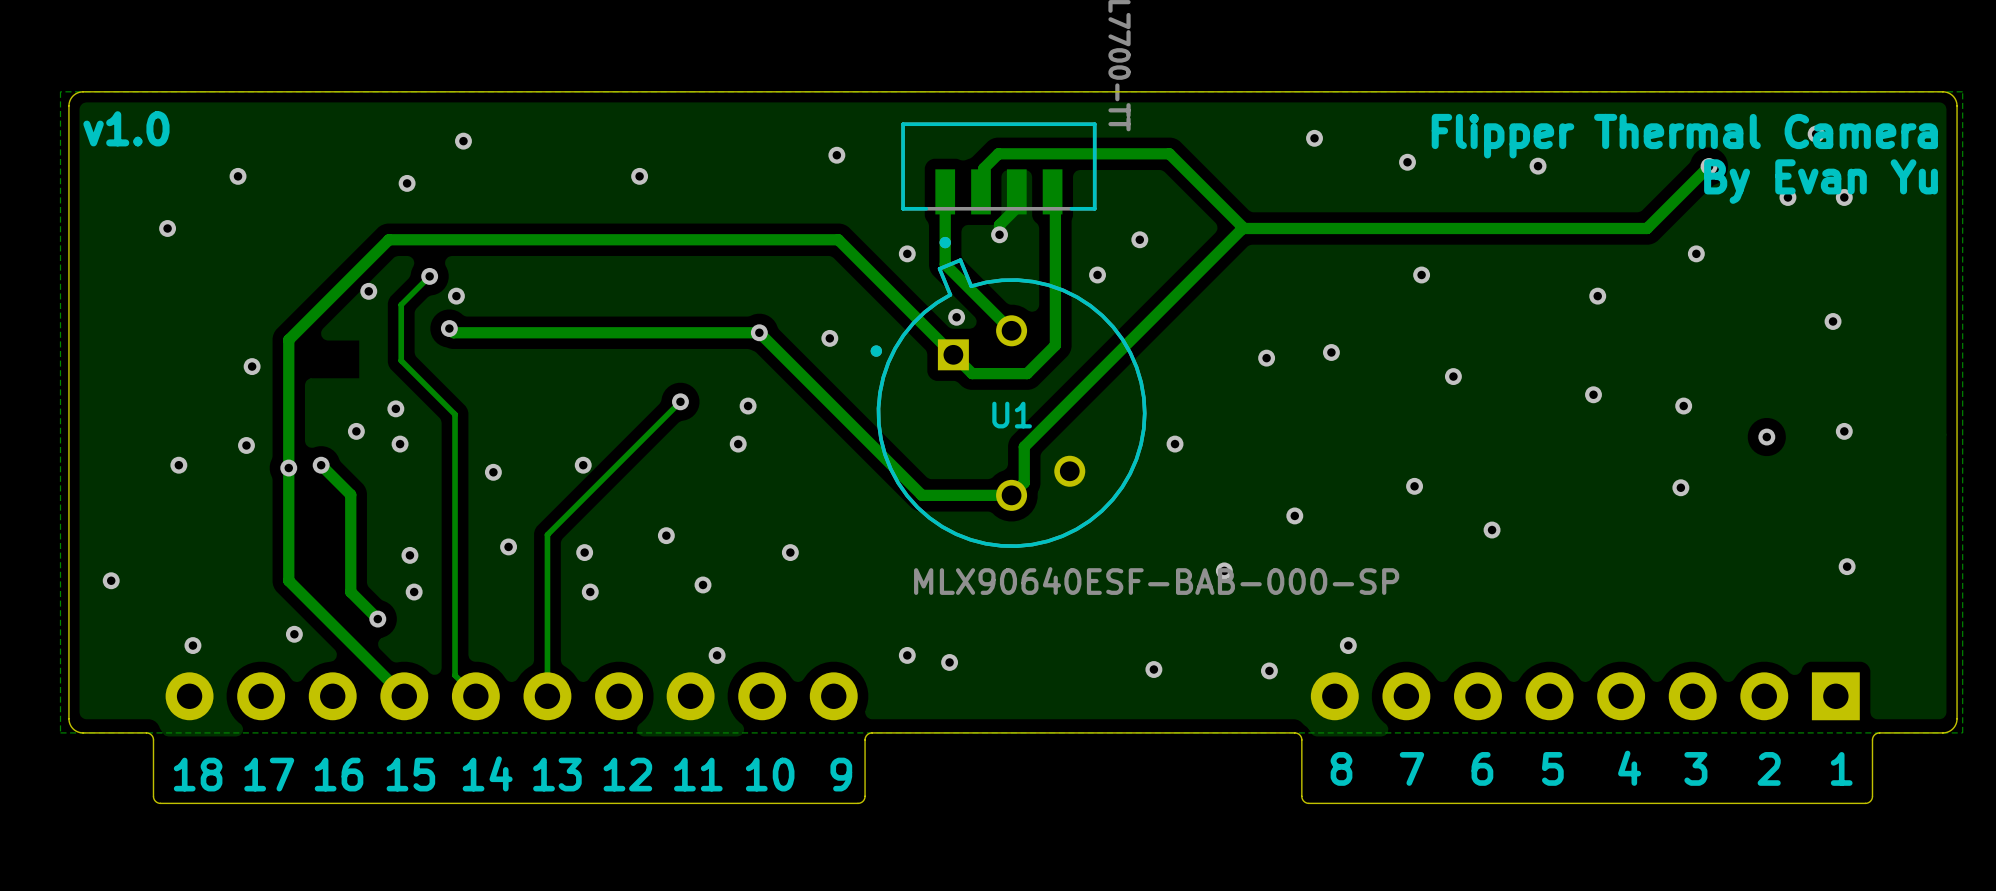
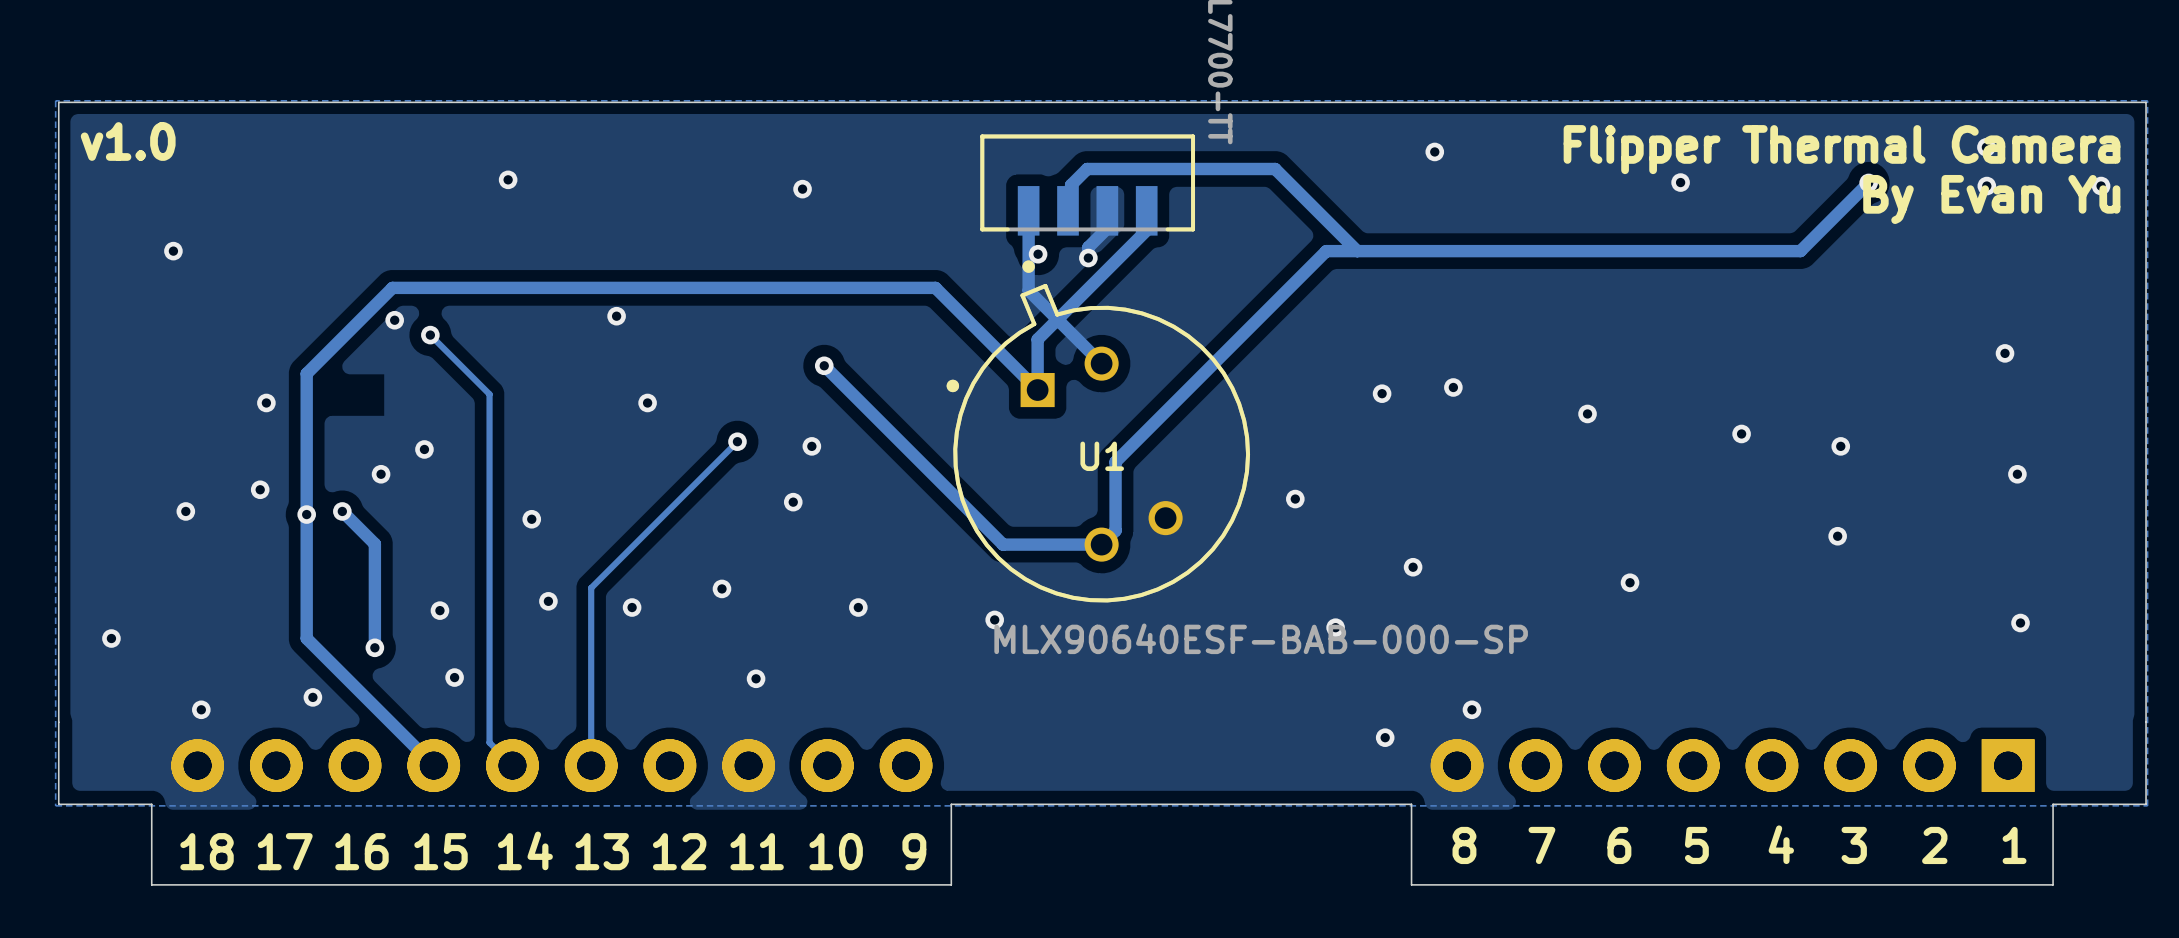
board edge: (1942, 91) (79, 92) (71, 97) (68, 105) (69, 722) (73, 728) (81, 732) (150, 734) (153, 739) (153, 797) (156, 801) (160, 803) (858, 803) (862, 801) (865, 797) (865, 738) (867, 734) (872, 732) (1295, 732) (1301, 738) (1301, 797) (1303, 801) (1308, 803) (1867, 802) (1872, 797) (1872, 739) (1874, 734) (1879, 732) (1944, 732) (1952, 728) (1956, 720) (1957, 105) (1952, 95) (1942, 91) -> none
via position: (463, 141) -> (508, 179)
via: (836, 155) -> none
via: (1407, 162) -> none
via: none -> (1986, 186)
via: none -> (2101, 186)
via: none -> (802, 189)
via: (238, 176) -> none
via: (639, 176) -> none
via: (407, 183) -> none
via: (1787, 197) -> none
via: (1844, 197) -> none
track: (1055, 206) (1055, 345) (1027, 373) (972, 373) (953, 354) -> (1149, 227) (1037, 339) (1037, 390)
track: (1242, 228) (1024, 446) -> (1355, 251) (1326, 251) (1115, 461) (1115, 491)
via: none -> (1038, 254)
via: (1139, 239) -> none
via: (907, 253) -> none
via: (1696, 253) -> none
track: (860, 261) (838, 239) (388, 239) (366, 261) -> (935, 287) (392, 287)
via: (1097, 274) -> none
via: (1421, 274) -> none
track: (429, 276) (401, 304) (401, 360) (455, 414) -> (430, 335) (489, 394) (489, 455)
via: (429, 276) -> none
via: none -> (616, 316)
via: (456, 296) -> none
via: (1597, 296) -> none
via: none -> (430, 335)
via: (956, 317) -> none
track: (449, 328) (453, 332) (759, 332) -> none
via: (449, 328) -> none
via: (829, 338) -> none
via: none -> (647, 402)
via: (1766, 437) -> none
via: (400, 444) -> none
via position: (738, 444) -> (793, 502)
via position: (1175, 444) -> (1295, 499)
via: (583, 465) -> none
via: (1414, 486) -> none
via: none -> (994, 619)
via: (703, 584) -> none
track: (350, 589) (350, 592) (377, 619) -> none
via: none -> (374, 647)
via: (414, 592) -> none
via: (590, 592) -> none
via: none -> (454, 677)
via: none -> (756, 678)
via: (377, 619) -> none
via: (717, 655) -> none
via: (907, 655) -> none
board edge: none -> (2146, 722) (2146, 102) (58, 102) (58, 722)
via: (949, 662) -> none
via: (1153, 669) -> none
part: none -> (1102, 803)

